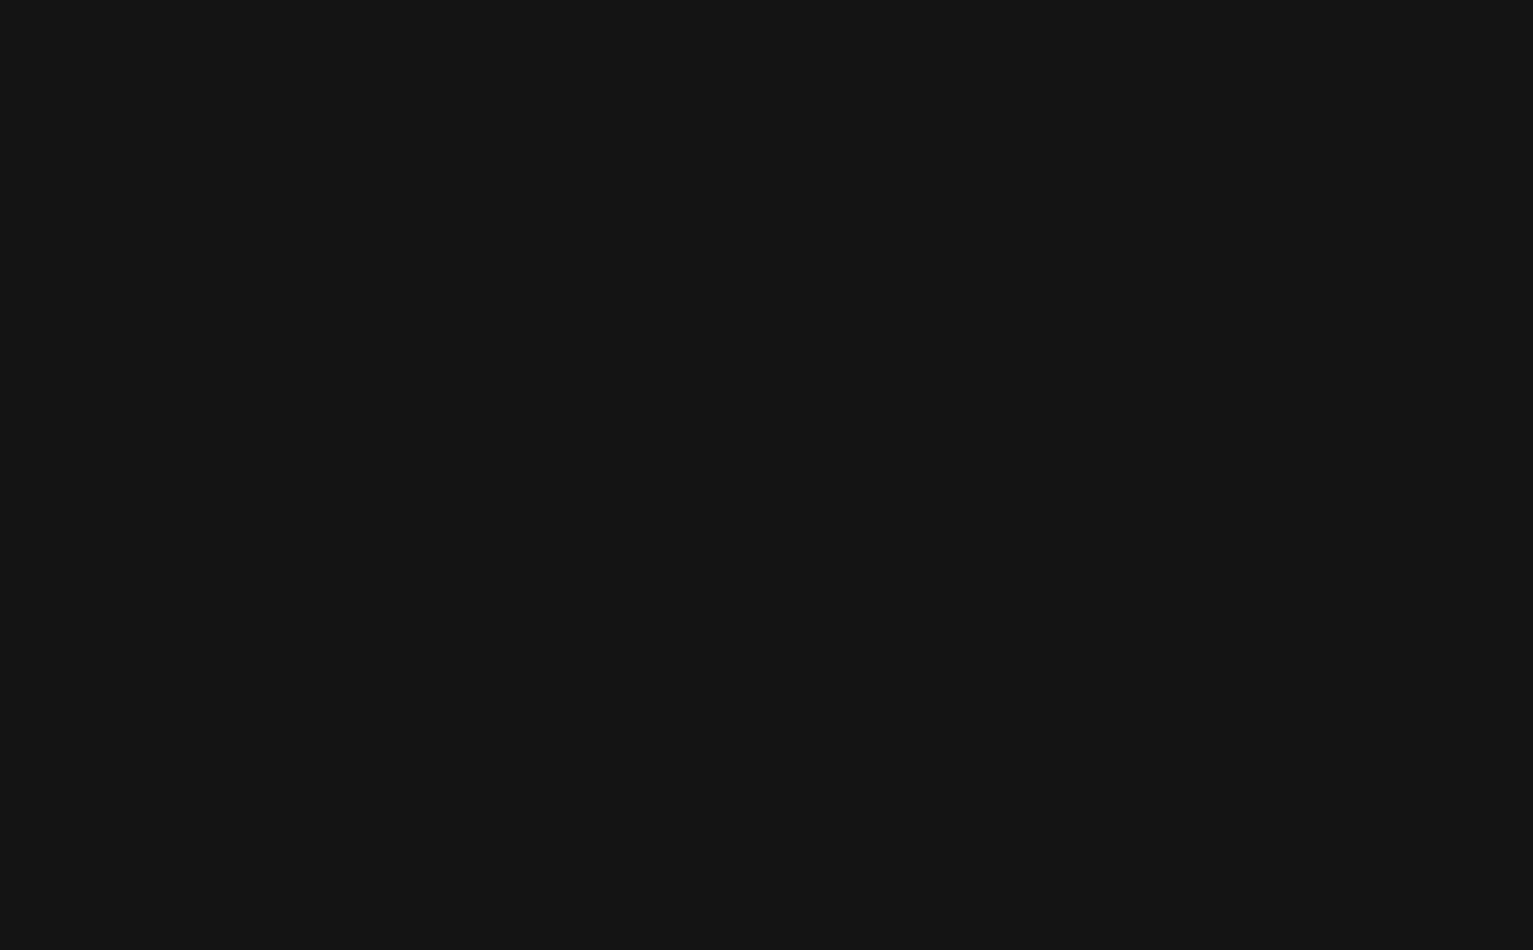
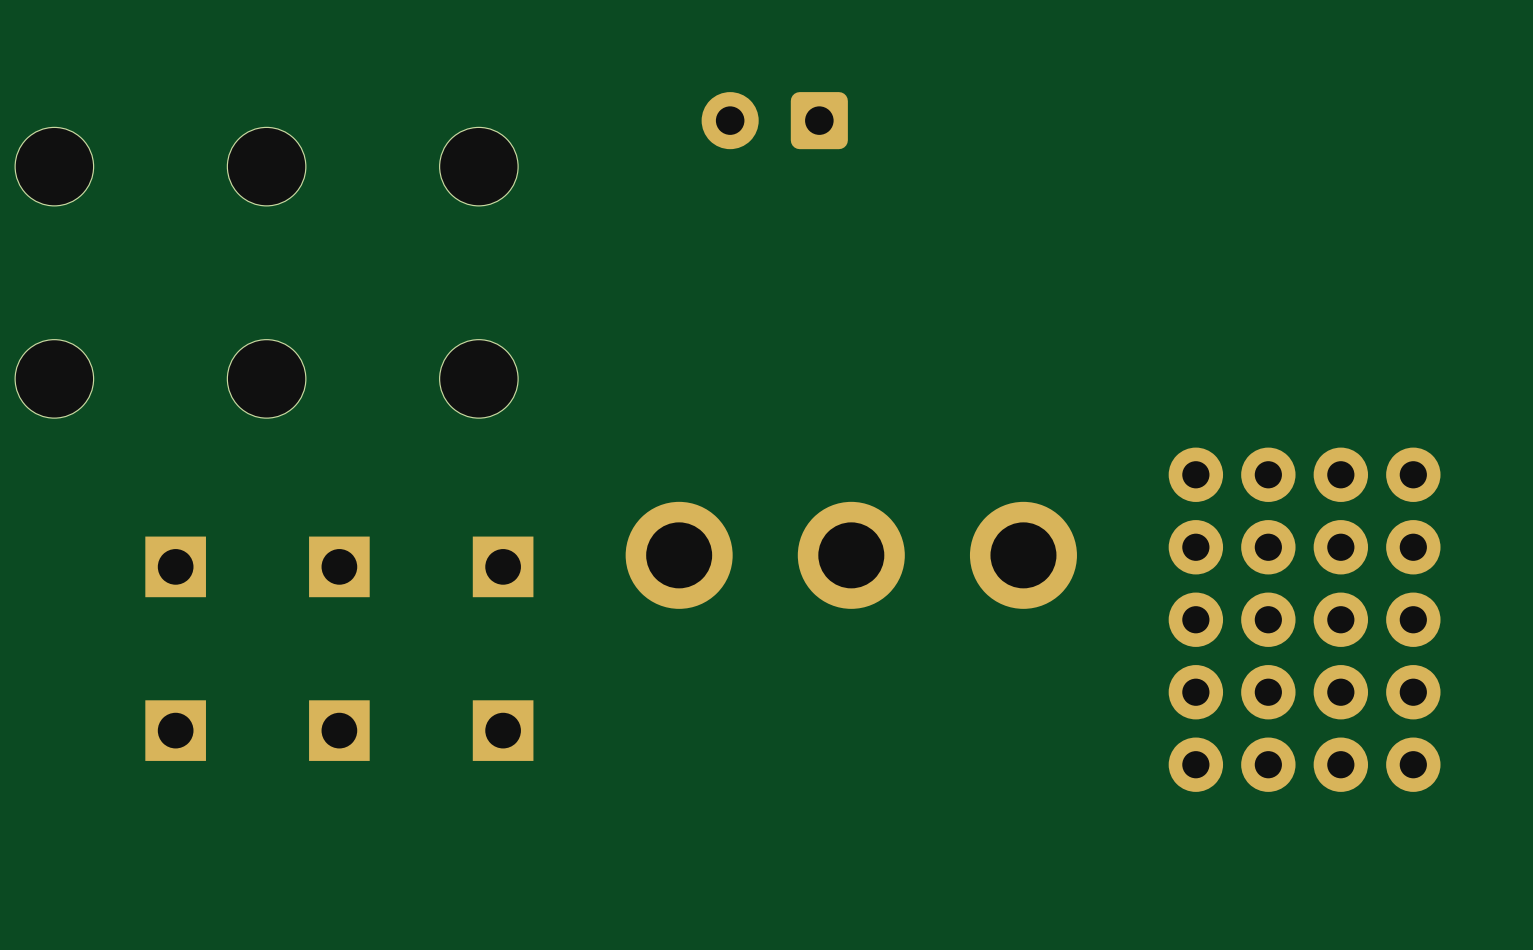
part: none -> (774, 120)
part: none -> (54, 166)
part: none -> (266, 166)
part: none -> (478, 166)
part: none -> (54, 378)
part: none -> (266, 378)
part: none -> (478, 378)
part: none -> (851, 555)
part: none -> (175, 566)
part: none -> (339, 566)
part: none -> (503, 566)
part: none -> (1304, 619)
part: none -> (175, 730)
part: none -> (339, 730)
part: none -> (503, 730)

